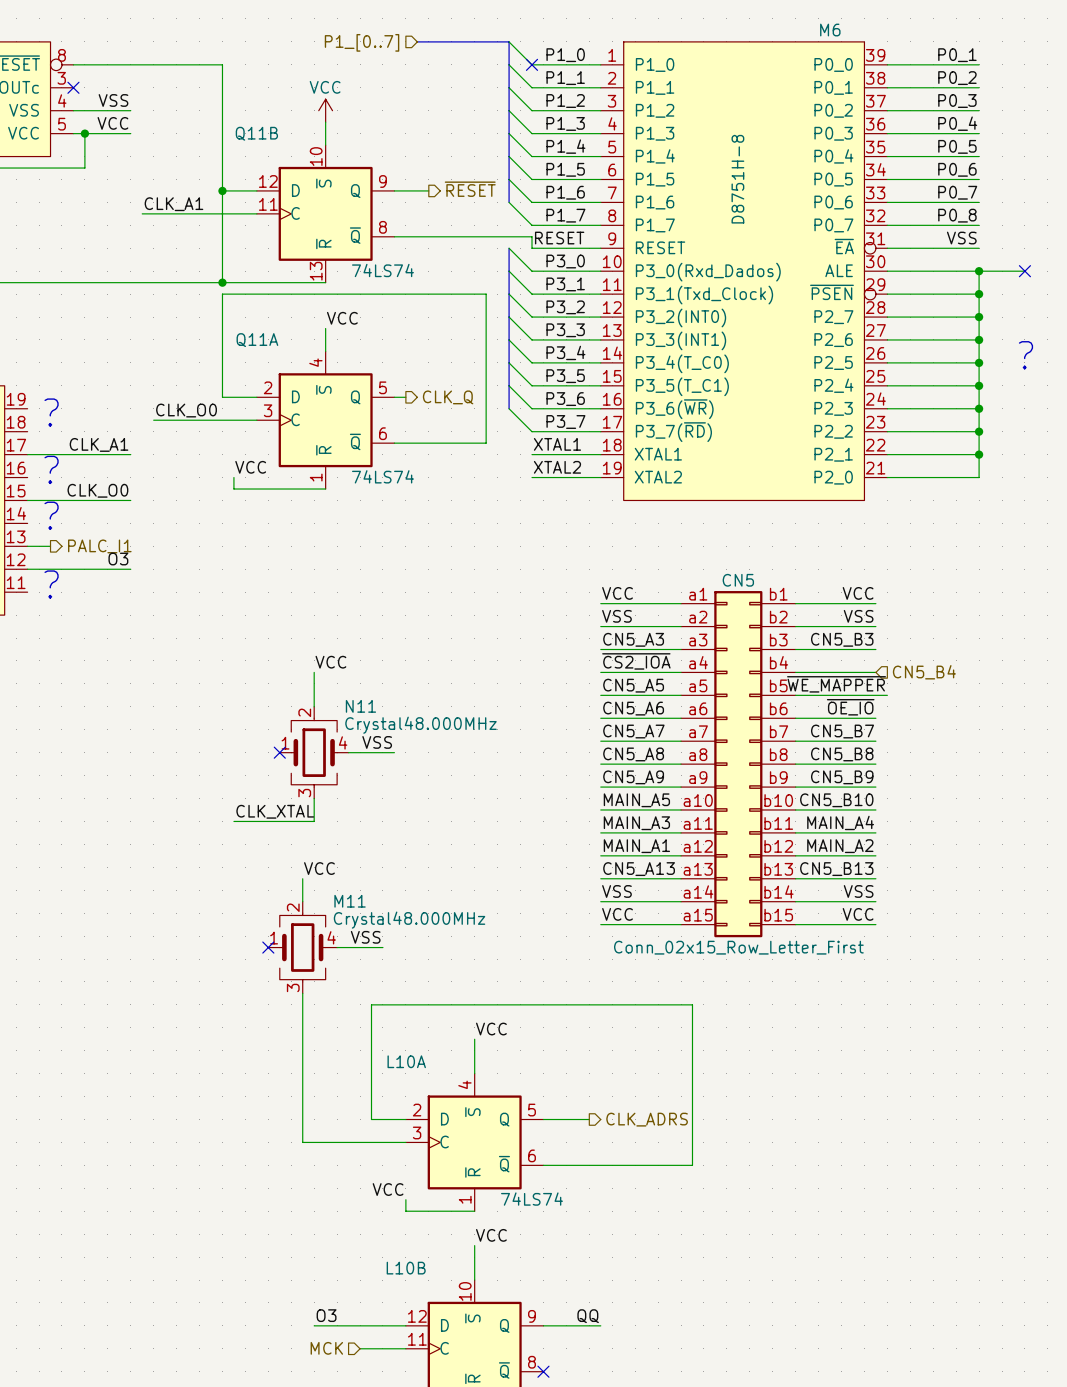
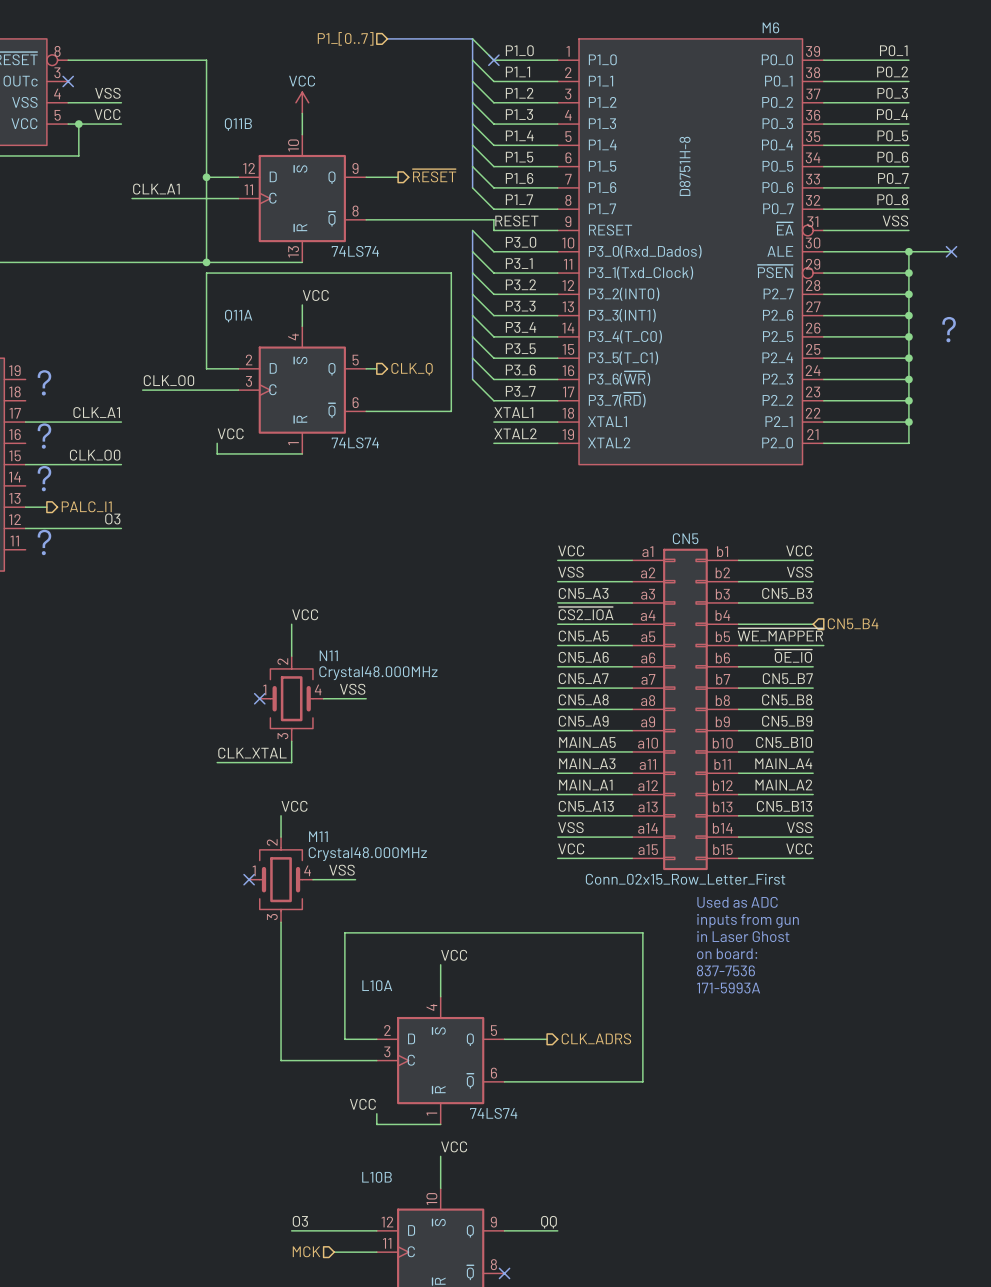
text: none -> Used as ADC (737, 902)
text: none -> inputs from gun (747, 920)
text: none -> in Laser Ghost (743, 936)
text: none -> on board: (727, 953)
text: none -> 837-7536 (725, 970)
text: none -> 171-5993A (728, 988)

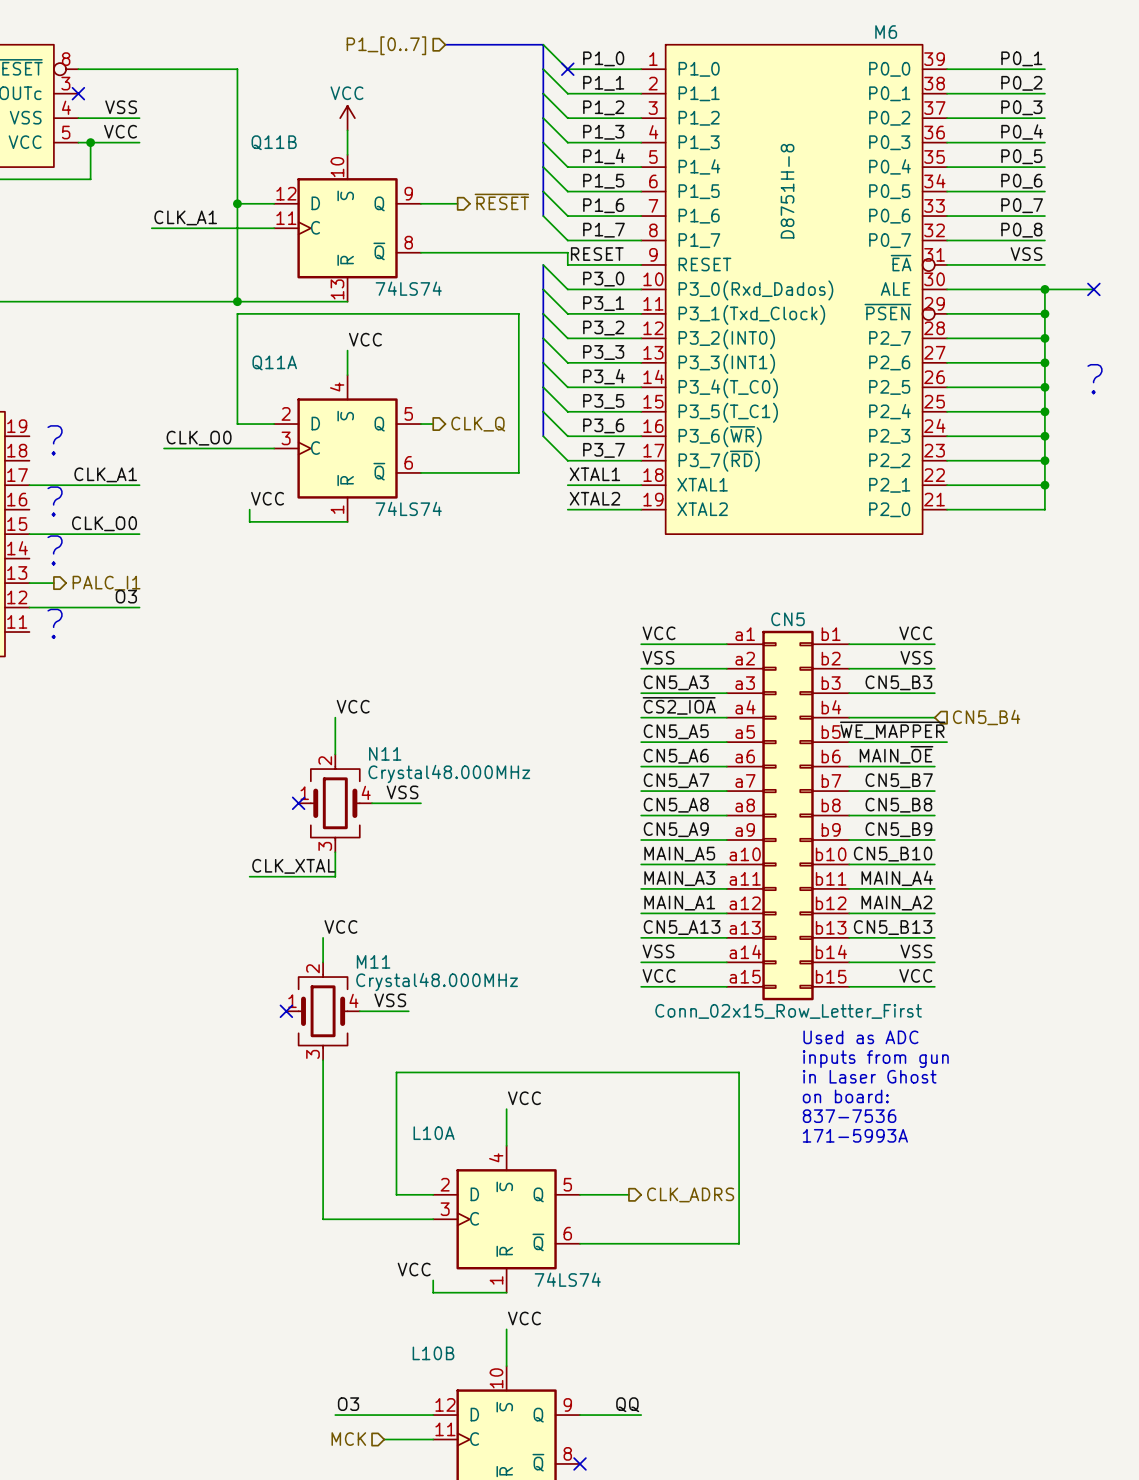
label: ~{OE_IO} (793, 656) -> MAIN_~{OE} (896, 754)

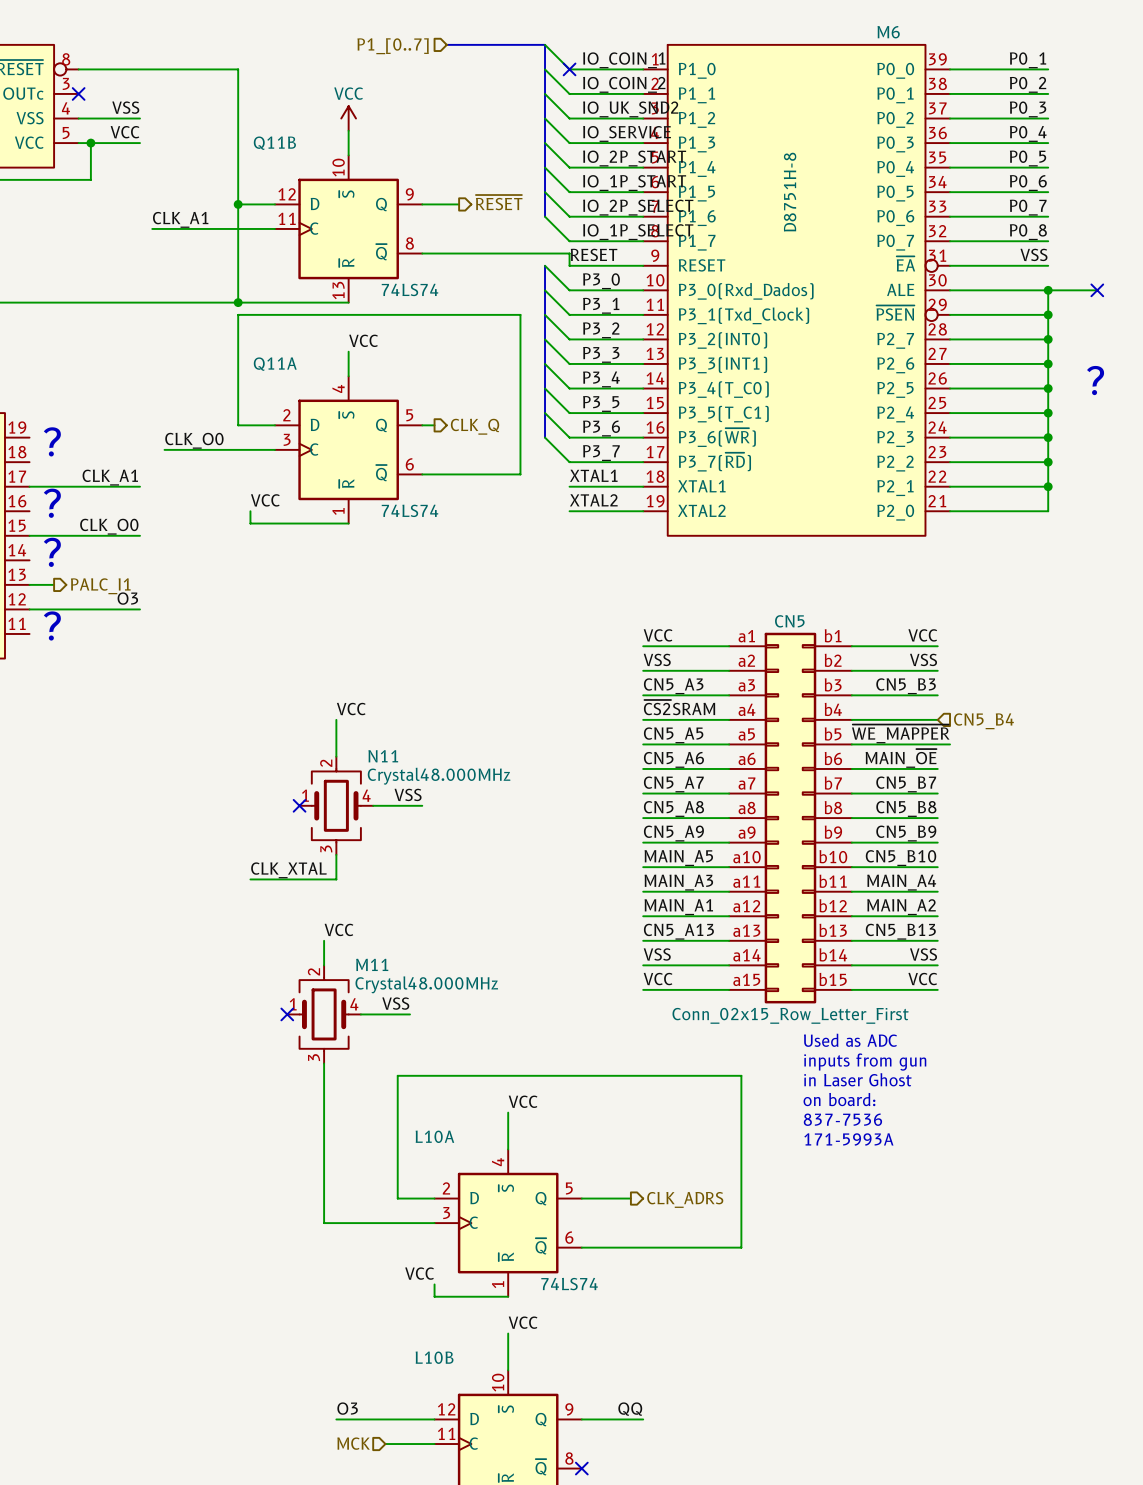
label: P1_0 (603, 58) -> IO_COIN_1 (624, 60)
label: P1_1 (603, 83) -> IO_COIN_2 (624, 84)
label: P1_2 (603, 107) -> IO_UK_SND2 (630, 109)
label: P1_3 (603, 132) -> IO_SERVICE (627, 133)
label: P1_4 (603, 156) -> IO_2P_START (634, 158)
label: P1_5 (603, 181) -> IO_1P_START (634, 183)
label: P1_6 (603, 205) -> IO_2P_SELECT (638, 207)
label: P1_7 (603, 230) -> IO_1P_SELECT (638, 232)
label: ~{CS2_IOA} (679, 705) -> ~{CS2}SRAM (679, 707)

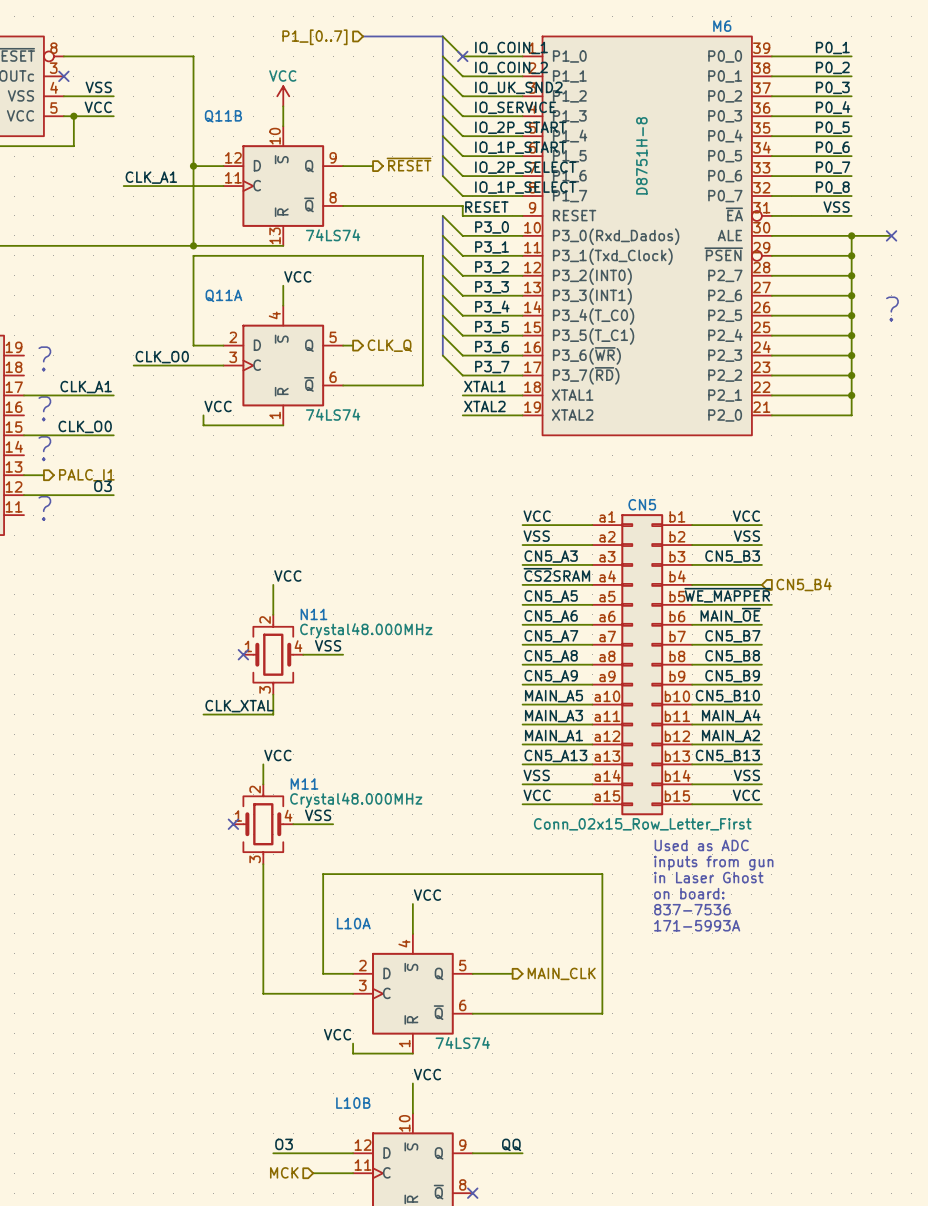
hierarchical label: CLK_ADRS (685, 1199) -> MAIN_CLK (561, 973)

